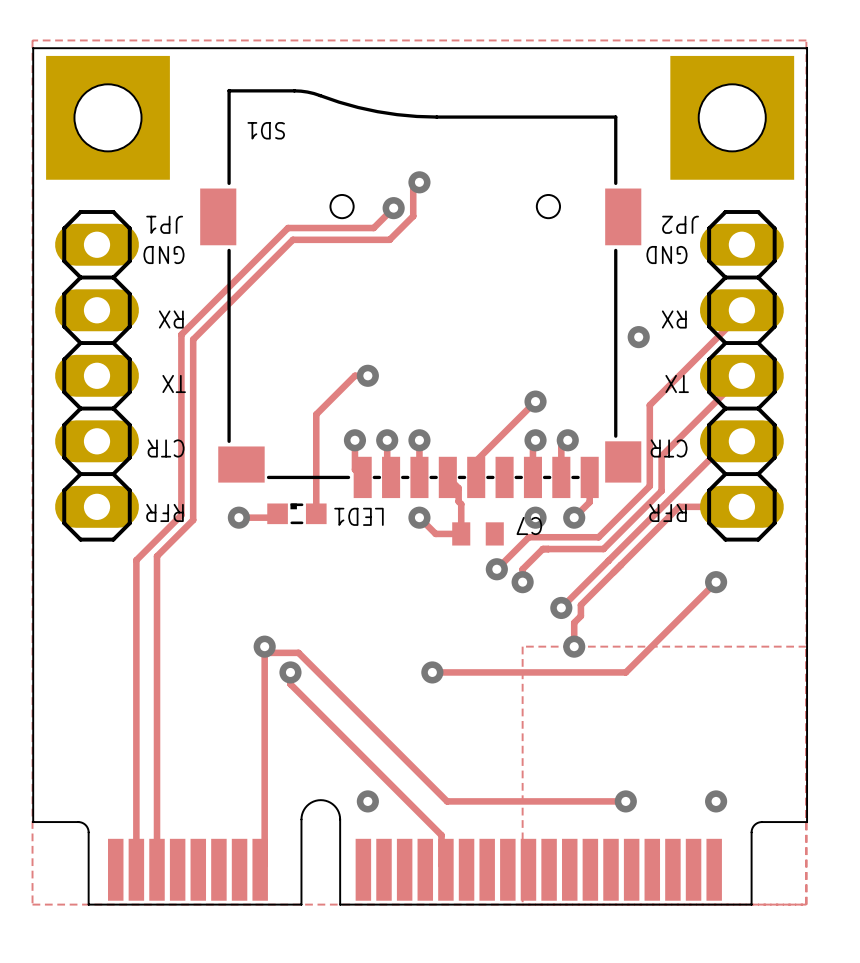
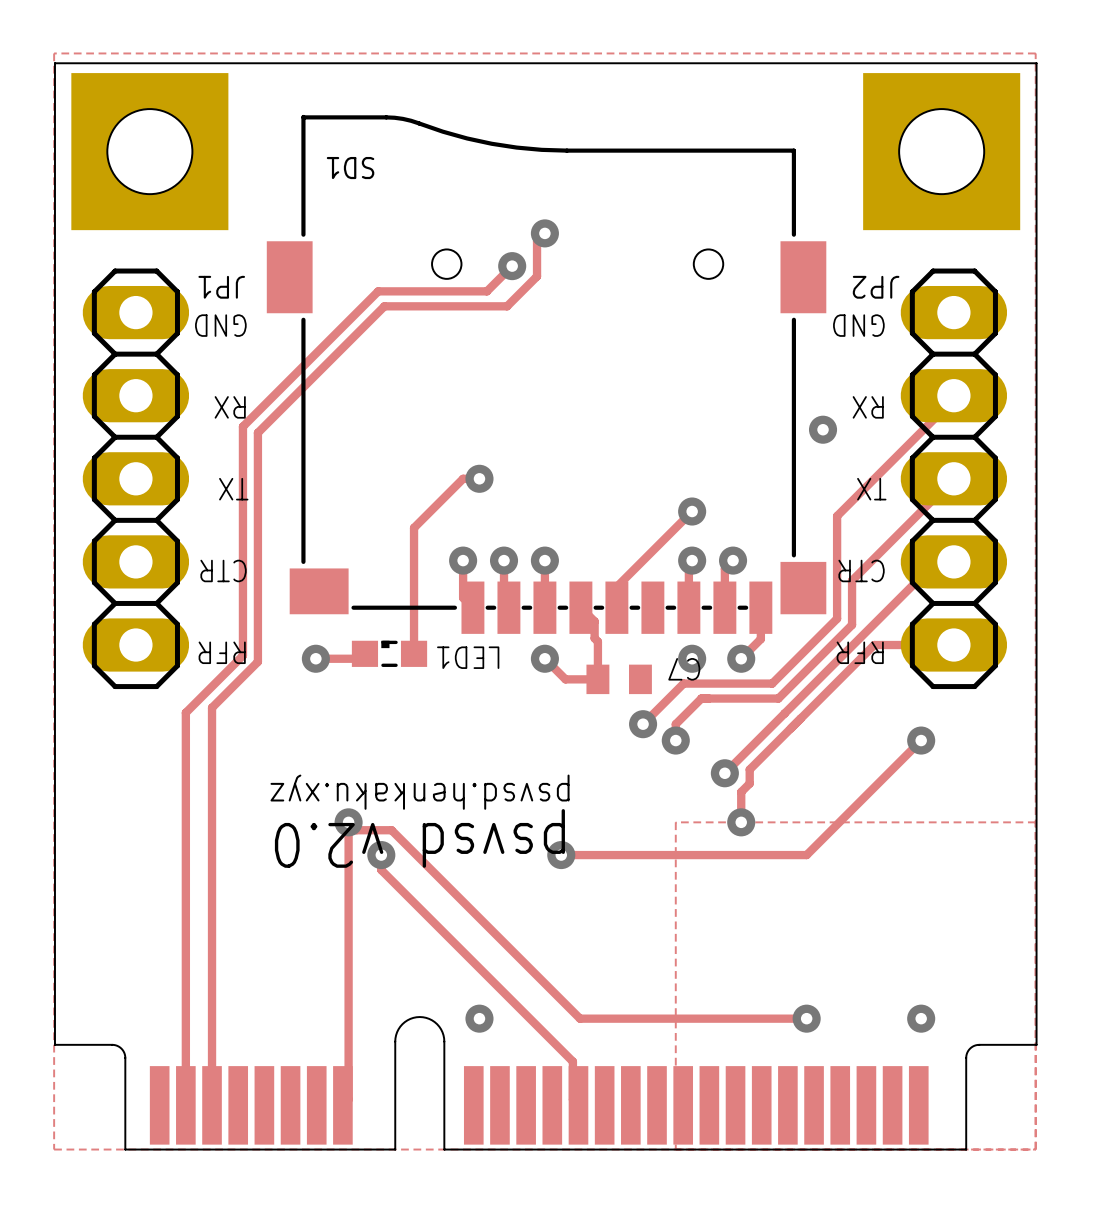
text: none -> psvsd.henkaku.xyz (420, 792)
text: none -> psvsd v2.0 (419, 838)

